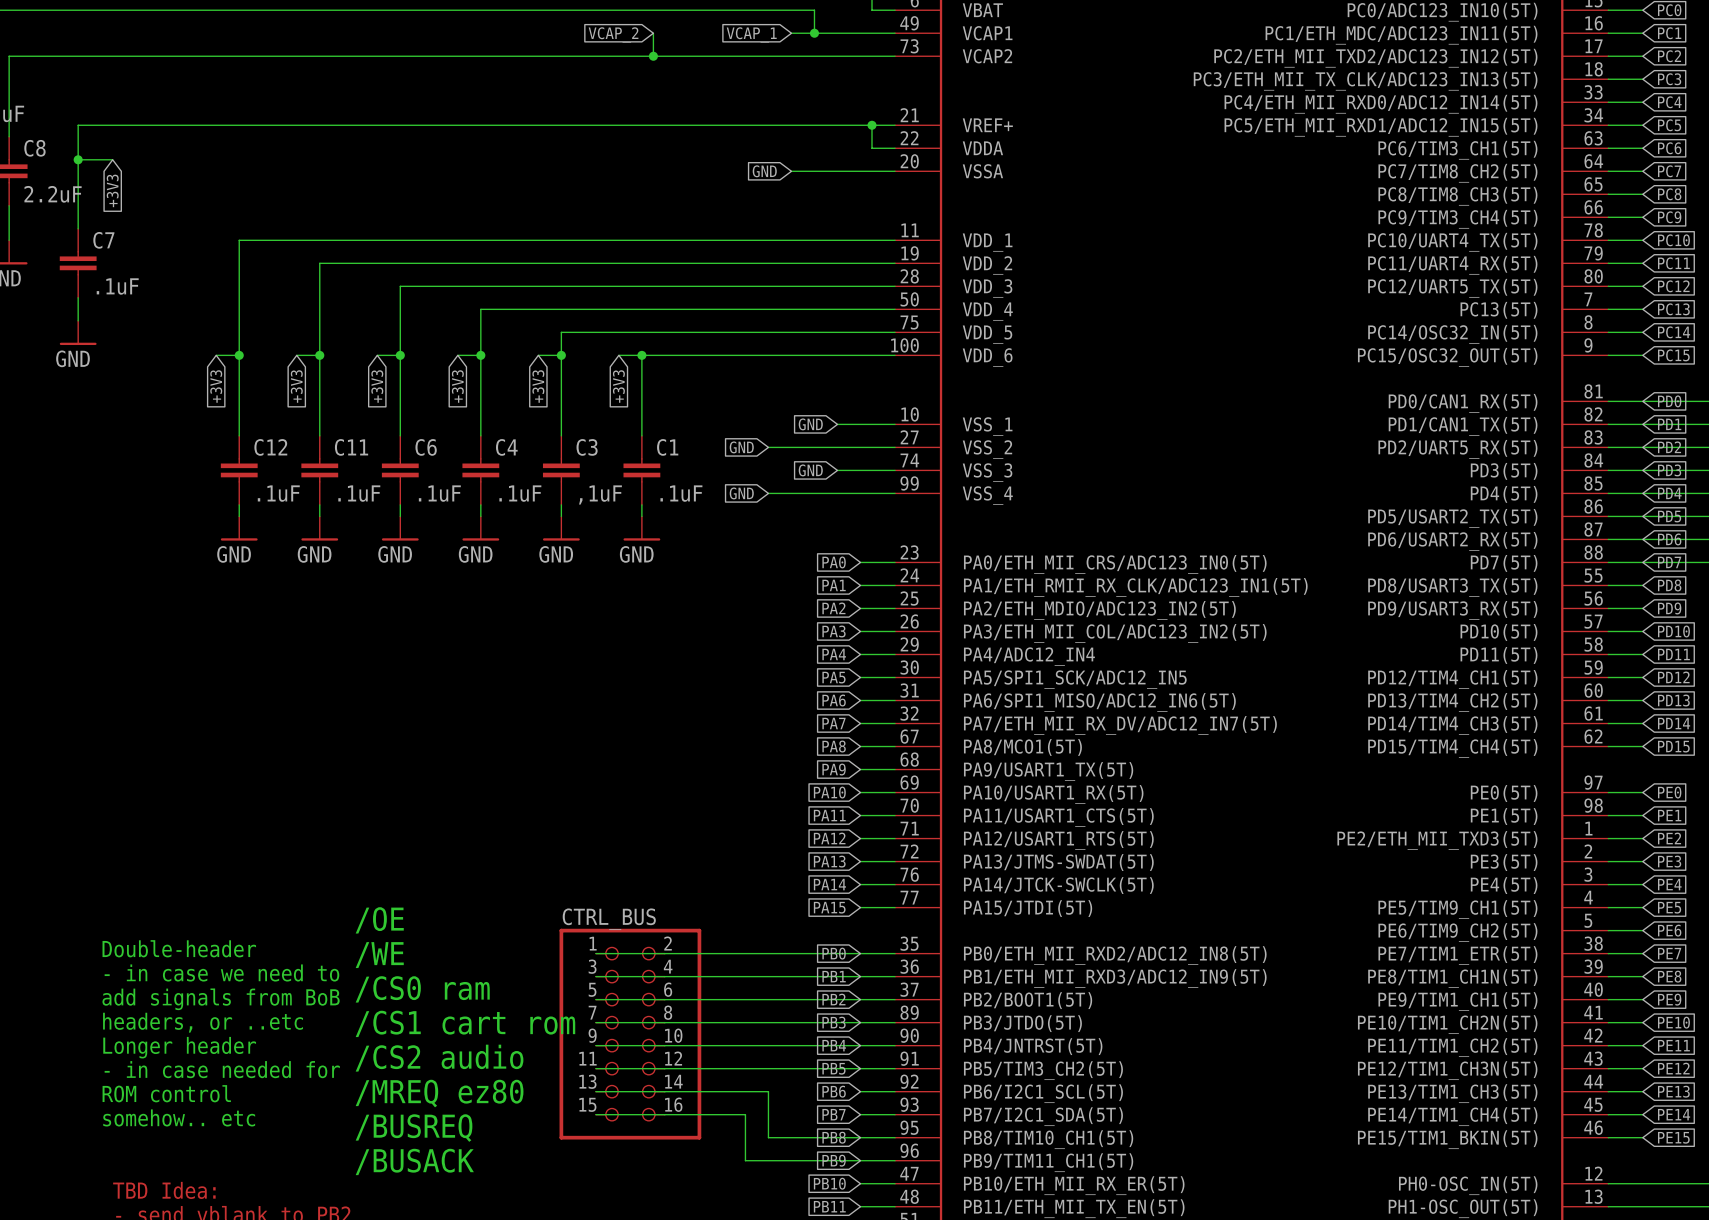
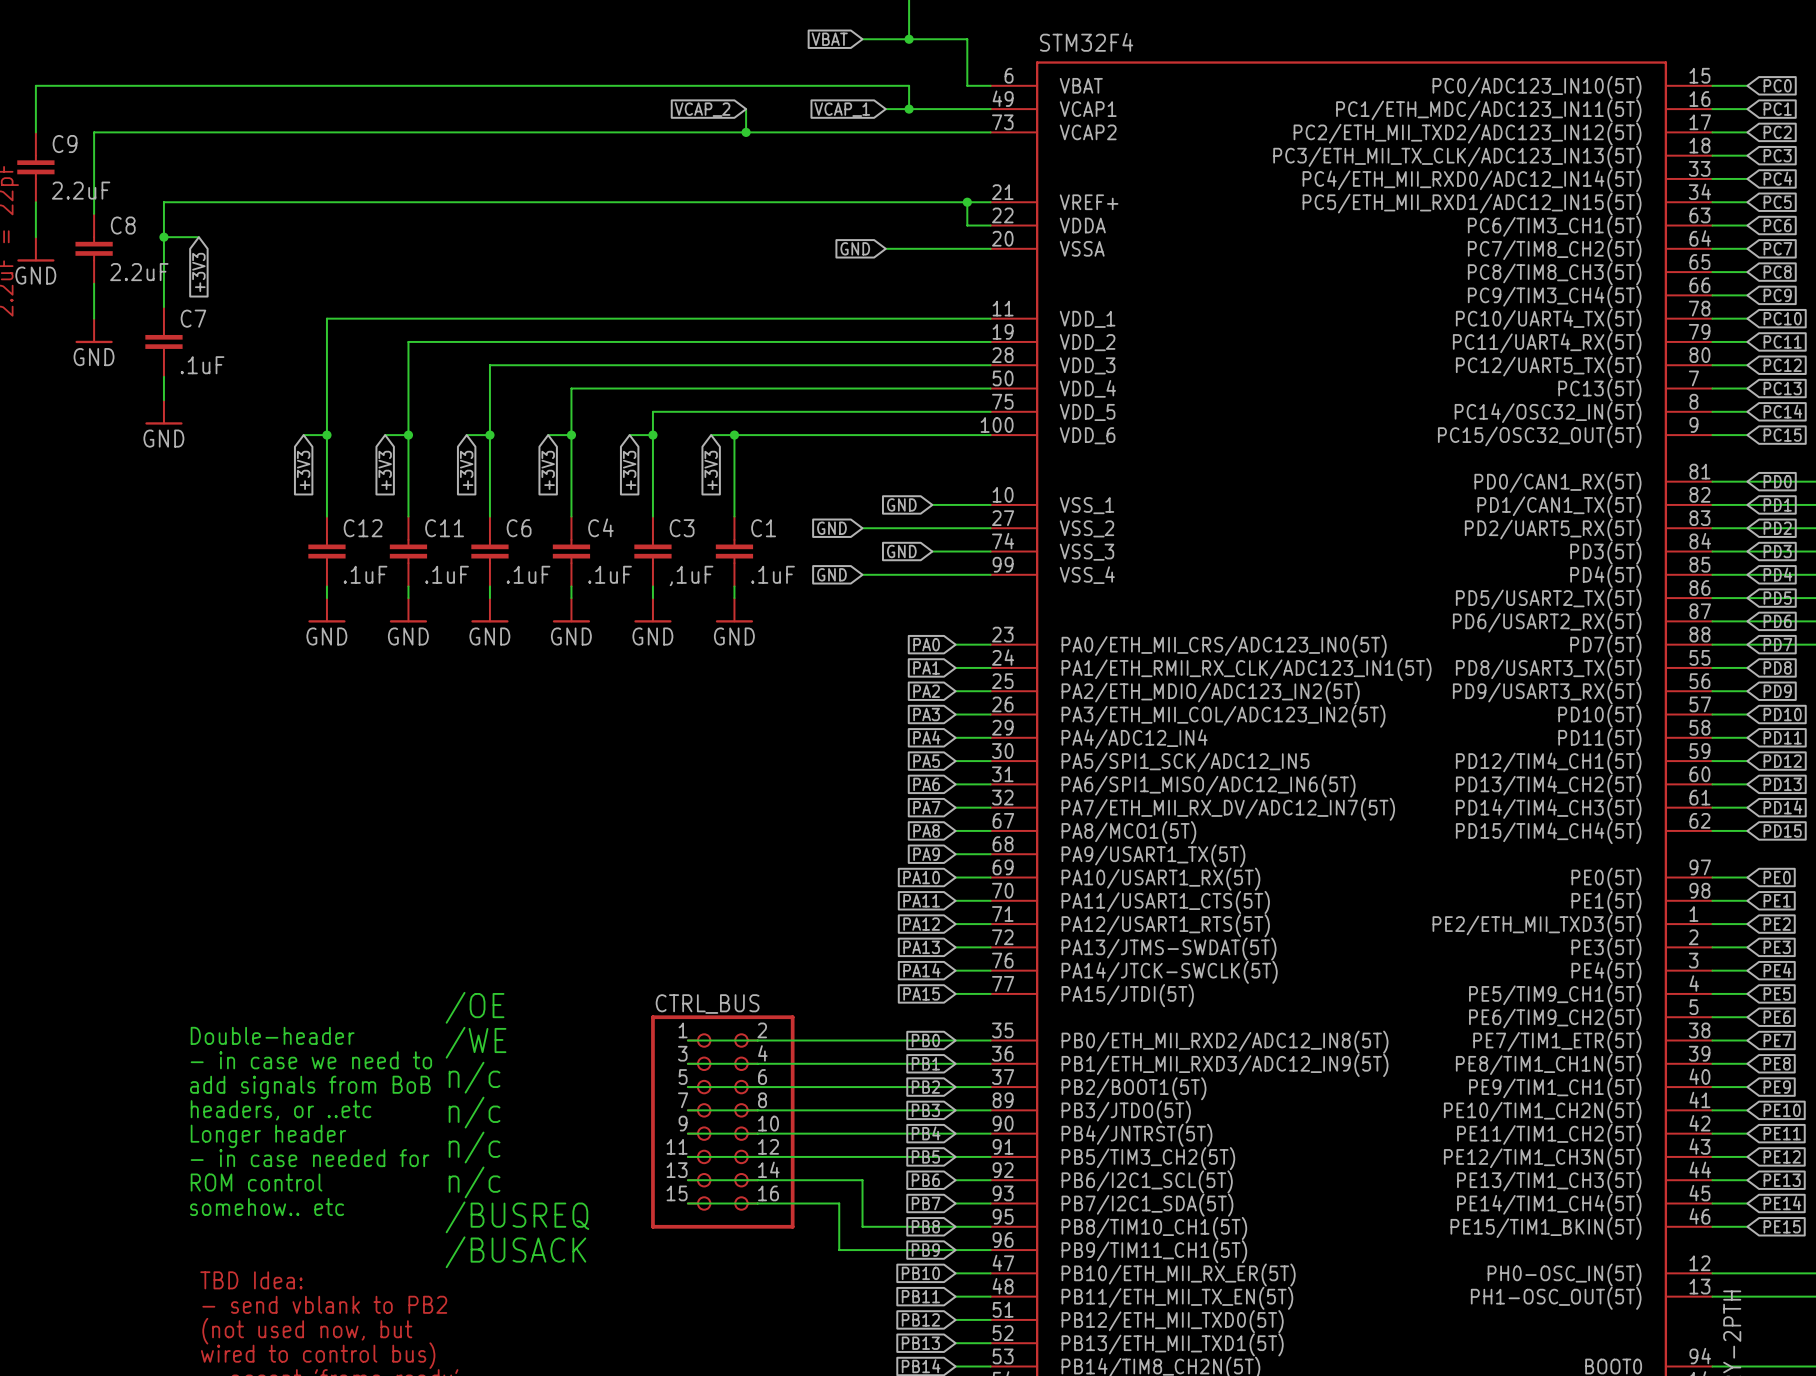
text: /CS0 ram (422, 989) -> n/c (474, 1077)
text: /CS1 cart rom (465, 1023) -> n/c (474, 1112)
text: /CS2 audio (439, 1058) -> n/c (474, 1147)
text: /MREQ ez80 (439, 1093) -> n/c (474, 1182)

